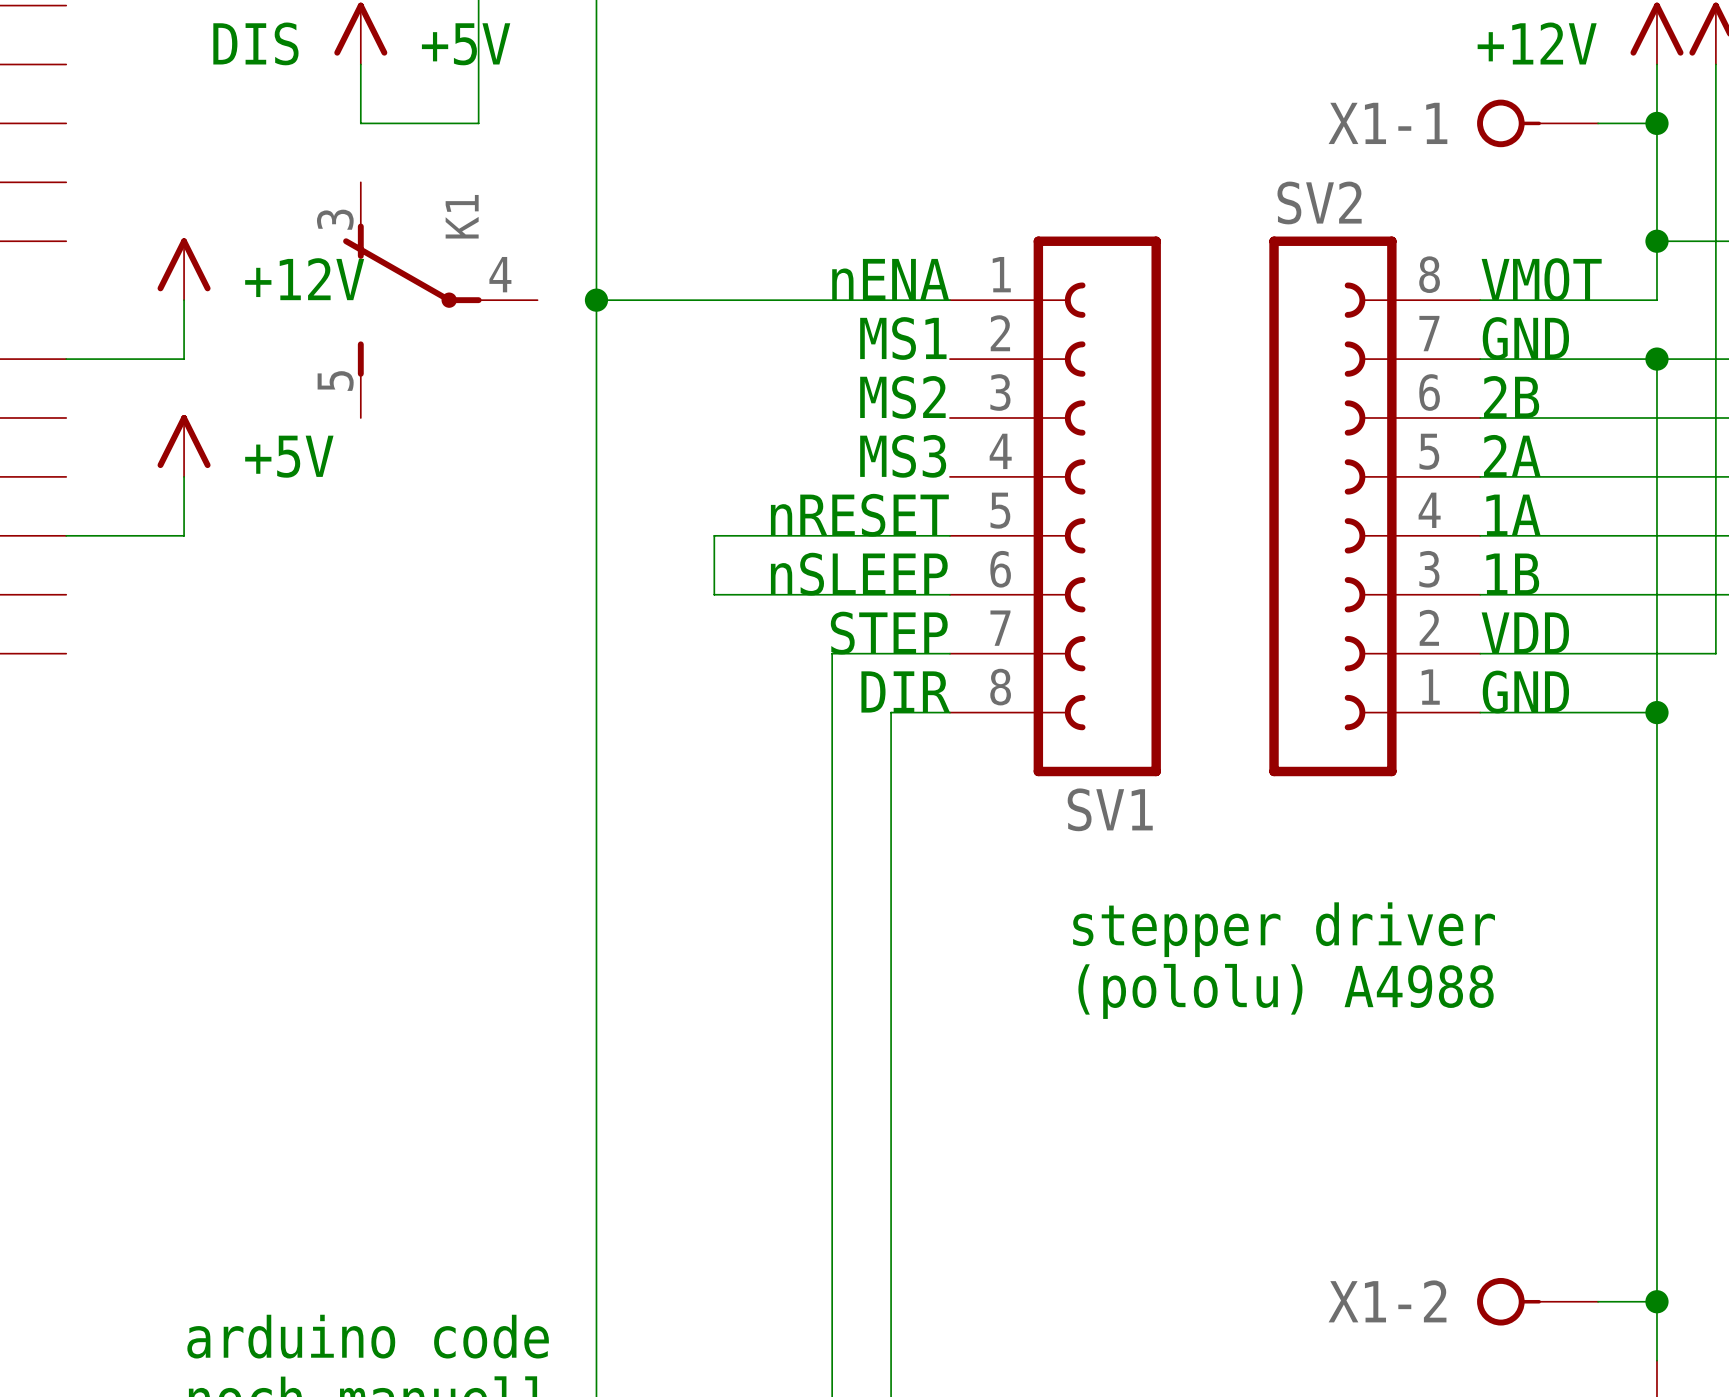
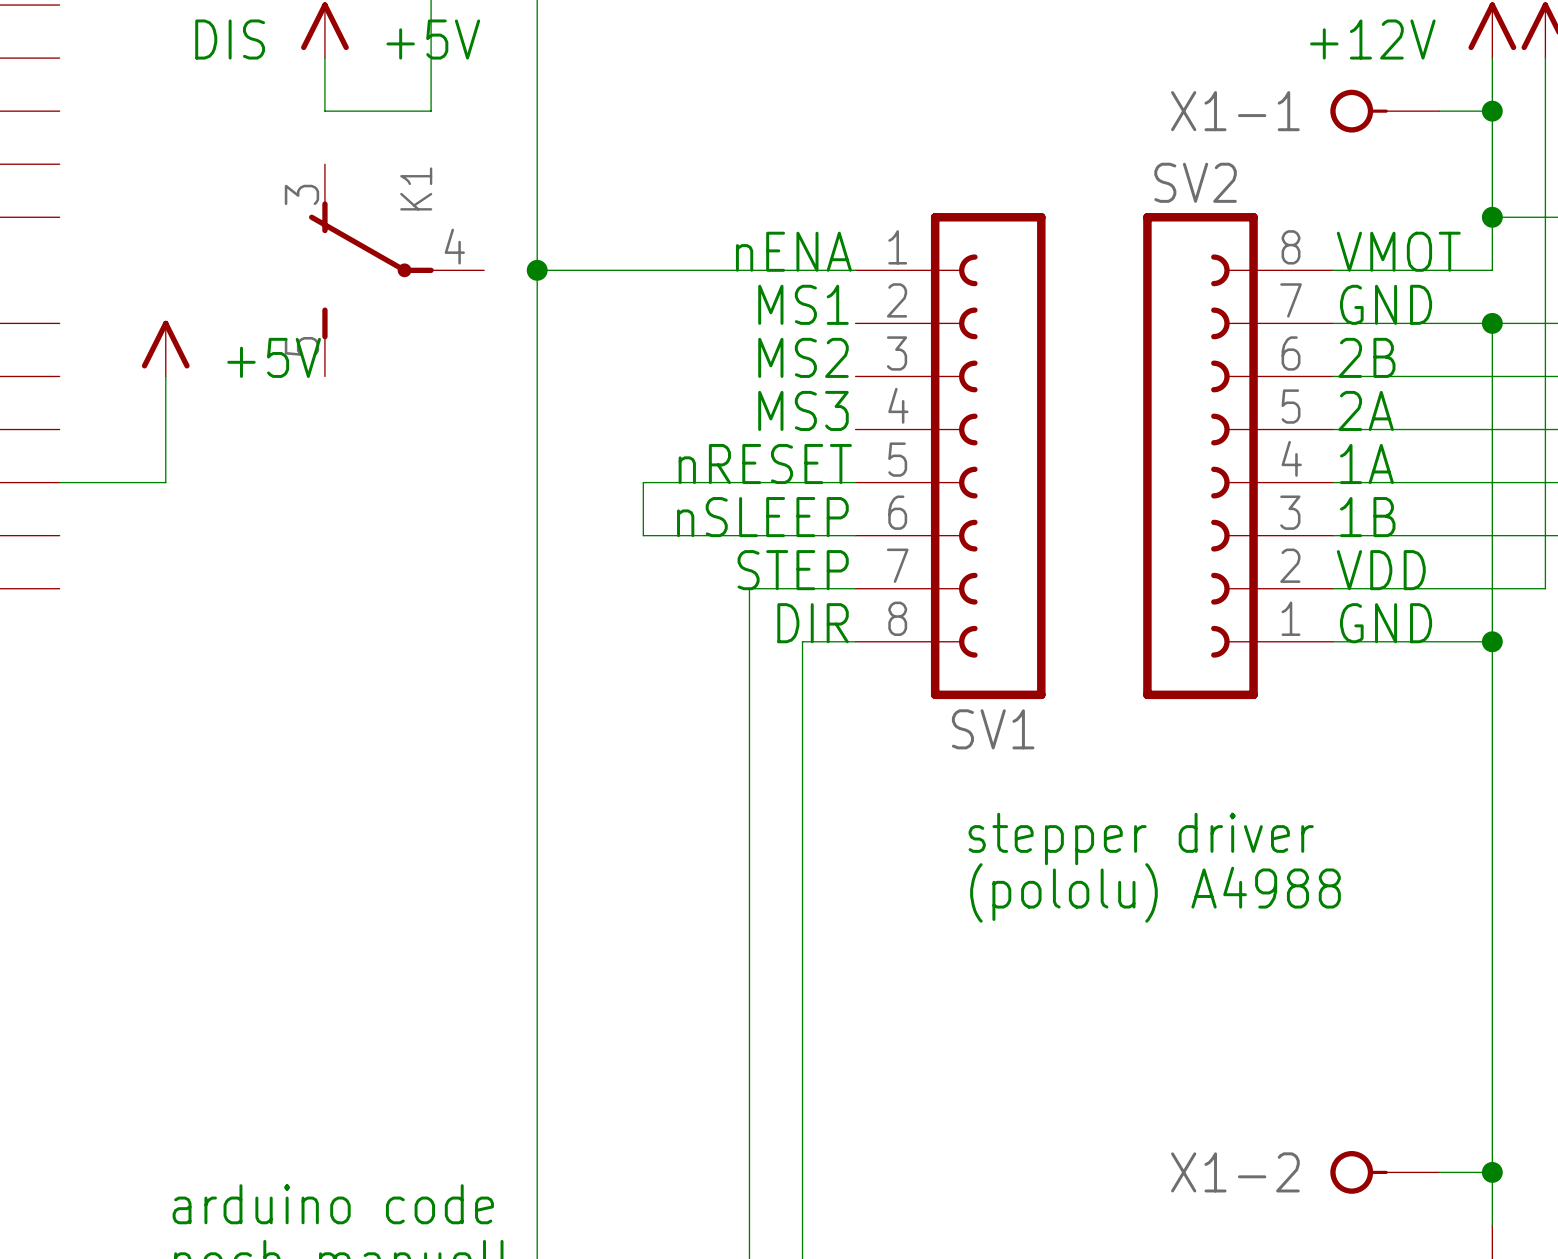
power symbol: (184, 269) -> none
text: +12V (304, 279) -> none
wire: (184, 300) (184, 359) (66, 359) -> none
power symbol: none -> (165, 348)
power symbol: (184, 445) -> none
text position: +5V (289, 456) -> +5V (274, 357)

